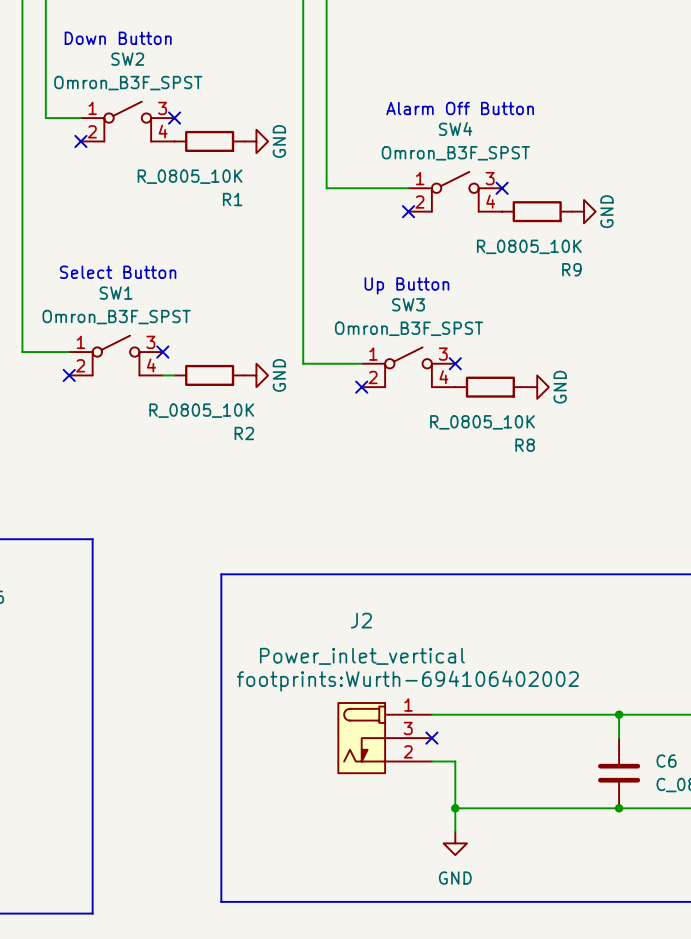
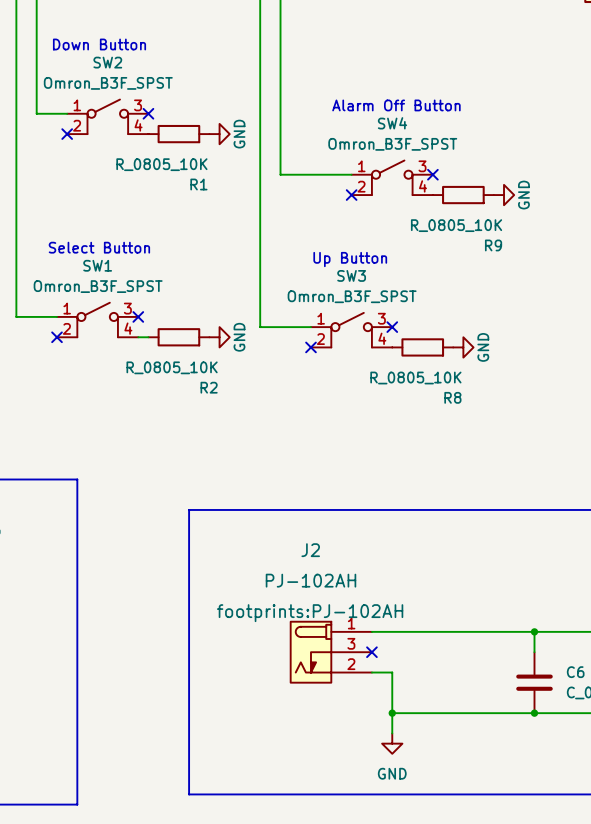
J2 value: Power_inlet_vertical (362, 656) -> PJ-102AH (310, 580)
J2 text: footprints:Wurth-694106402002 (407, 681) -> footprints:PJ-102AH (310, 613)

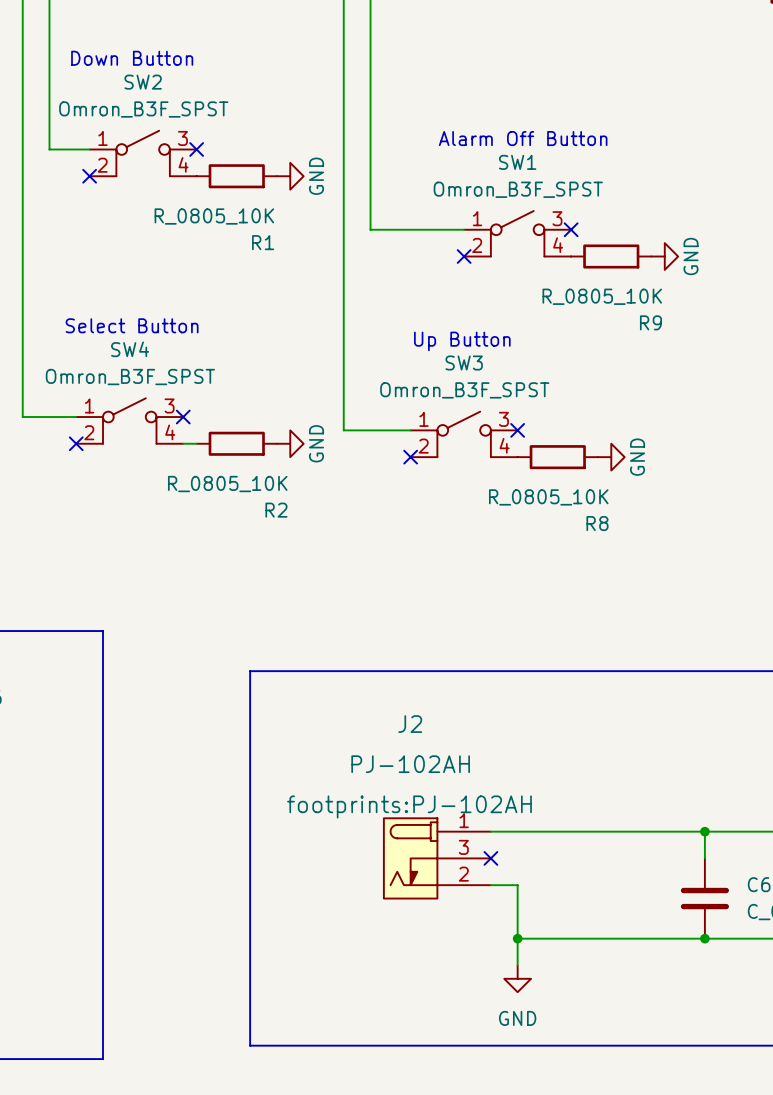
SW4 name: SW4 (392, 123) -> SW1 (517, 162)
SW1 name: SW1 (97, 265) -> SW4 (130, 349)

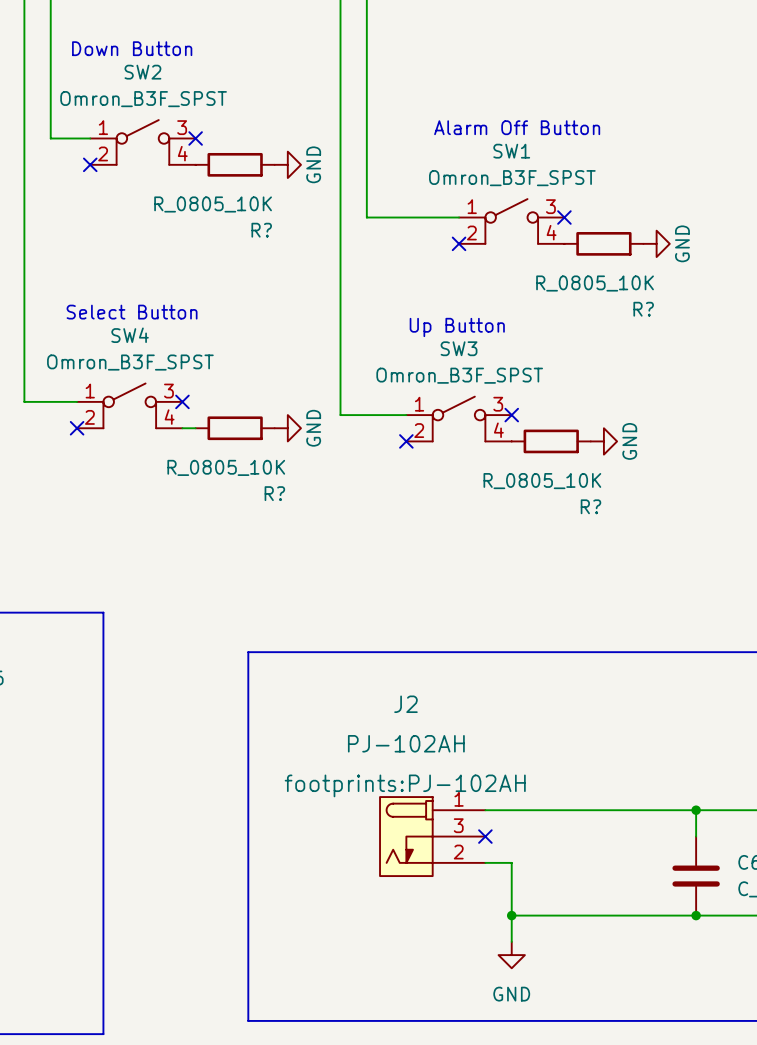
R1 name: R1 (263, 242) -> R? (261, 230)
R9 name: R9 (650, 322) -> R? (643, 309)
R2 name: R2 (276, 510) -> R? (274, 493)
R8 name: R8 (597, 523) -> R? (590, 506)

